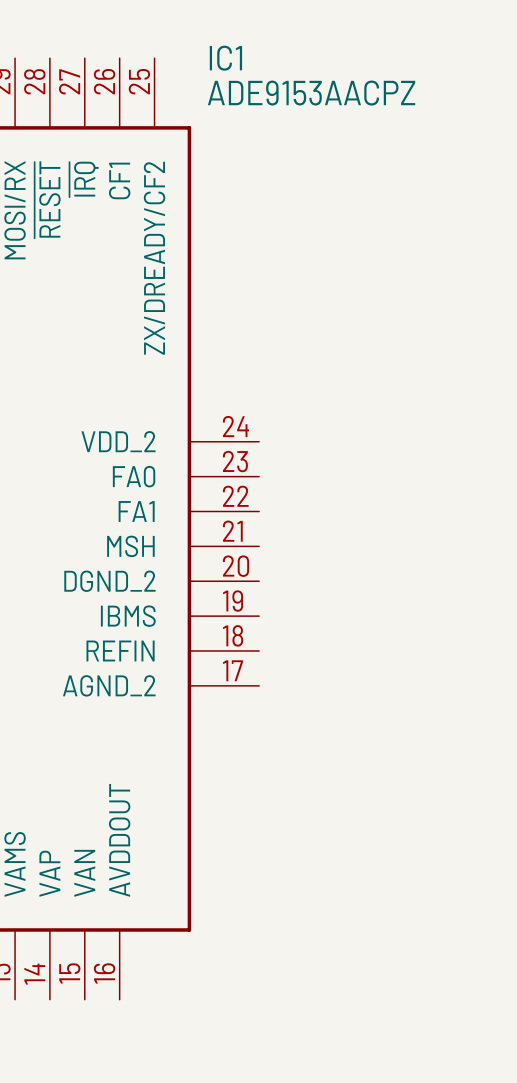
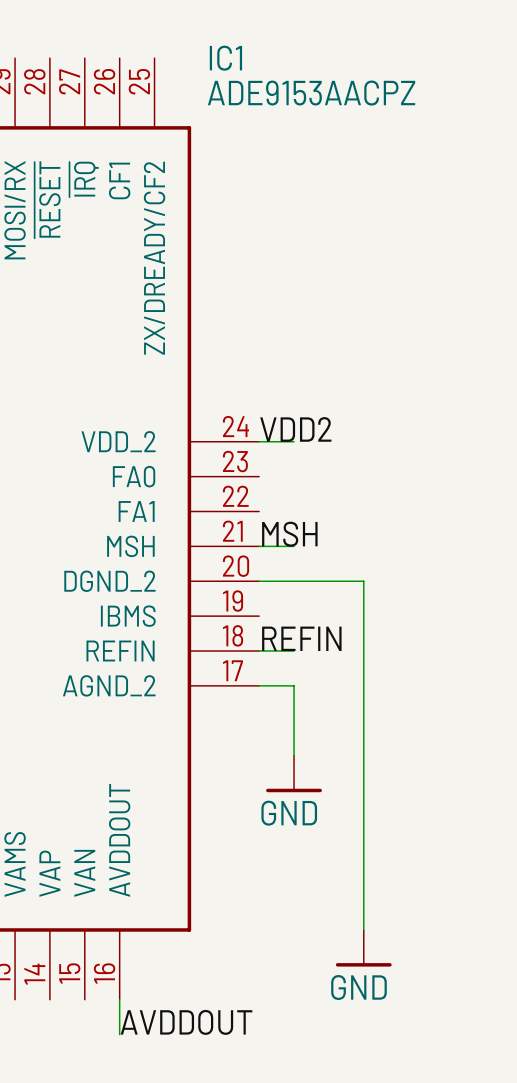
label: none -> VDD2 (295, 429)
wire: none -> (259, 441) (294, 441)
label: none -> MSH (289, 534)
wire: none -> (259, 546) (294, 546)
wire: none -> (259, 581) (363, 581) (363, 929)
label: none -> REFIN (301, 638)
wire: none -> (259, 650) (294, 650)
wire: none -> (259, 685) (294, 685) (294, 755)
power symbol: none -> GND (294, 773)
power symbol: none -> GND (363, 948)
wire: none -> (119, 999) (119, 1034)
label: none -> AVDDOUT (186, 1022)

